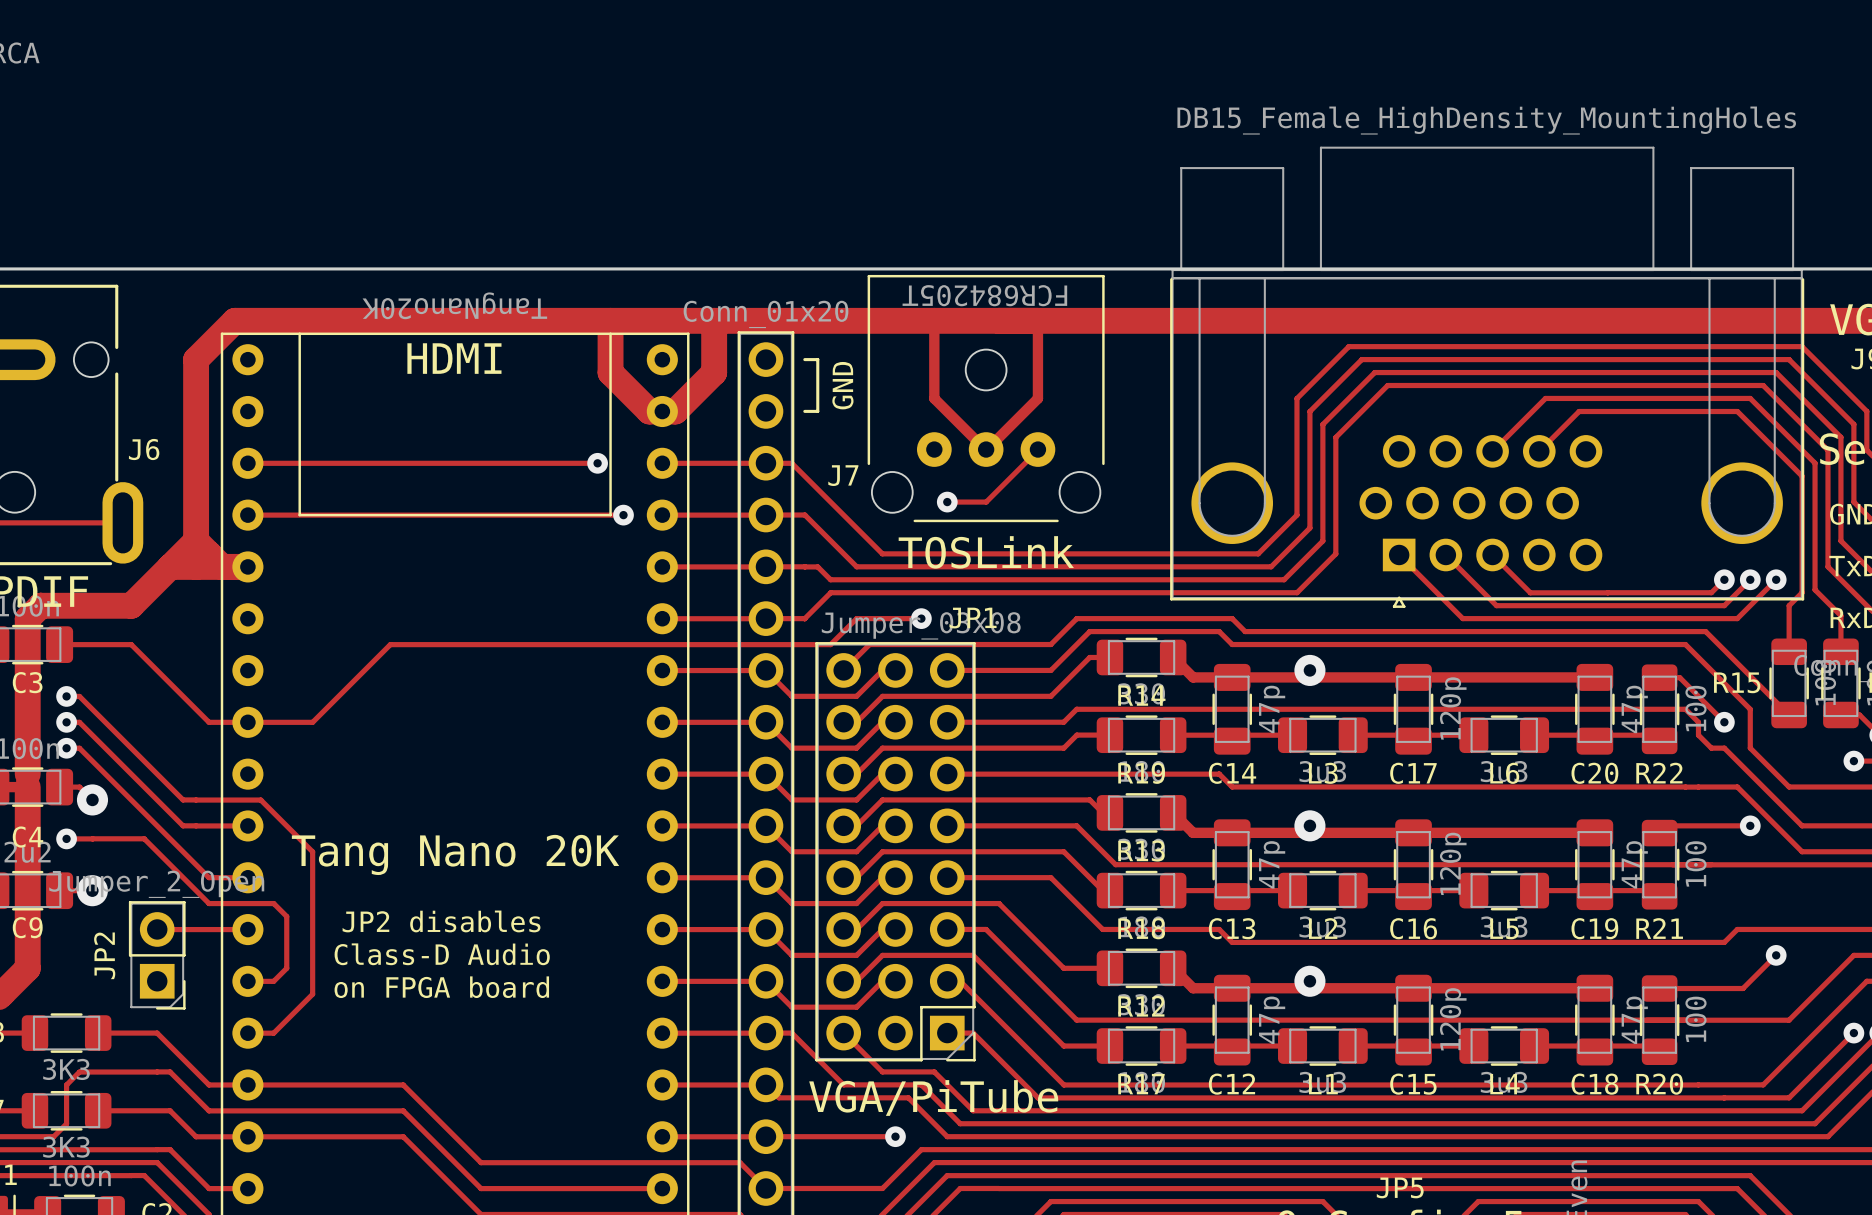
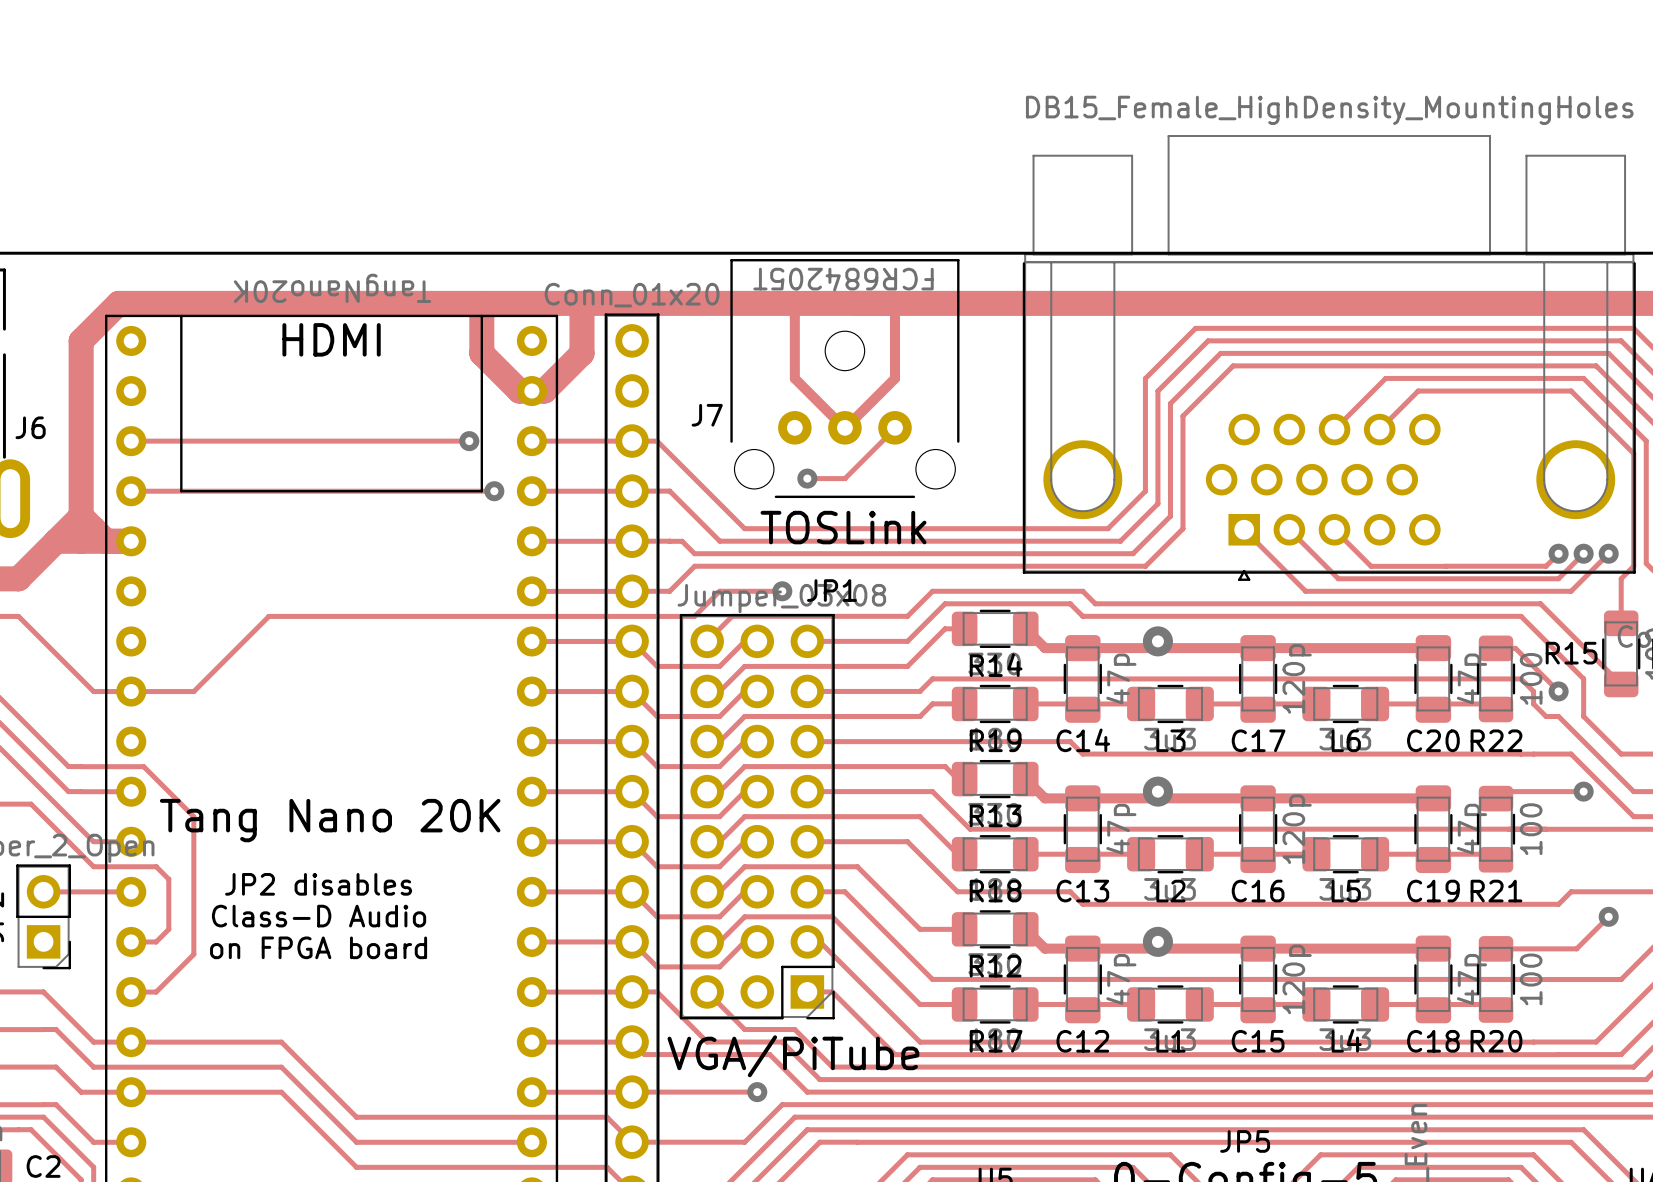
line: (804, 359) (817, 359) (817, 411) (804, 411) -> none
text: GND (842, 385) -> none
J7 name position: J7 (843, 475) -> J7 (707, 415)

